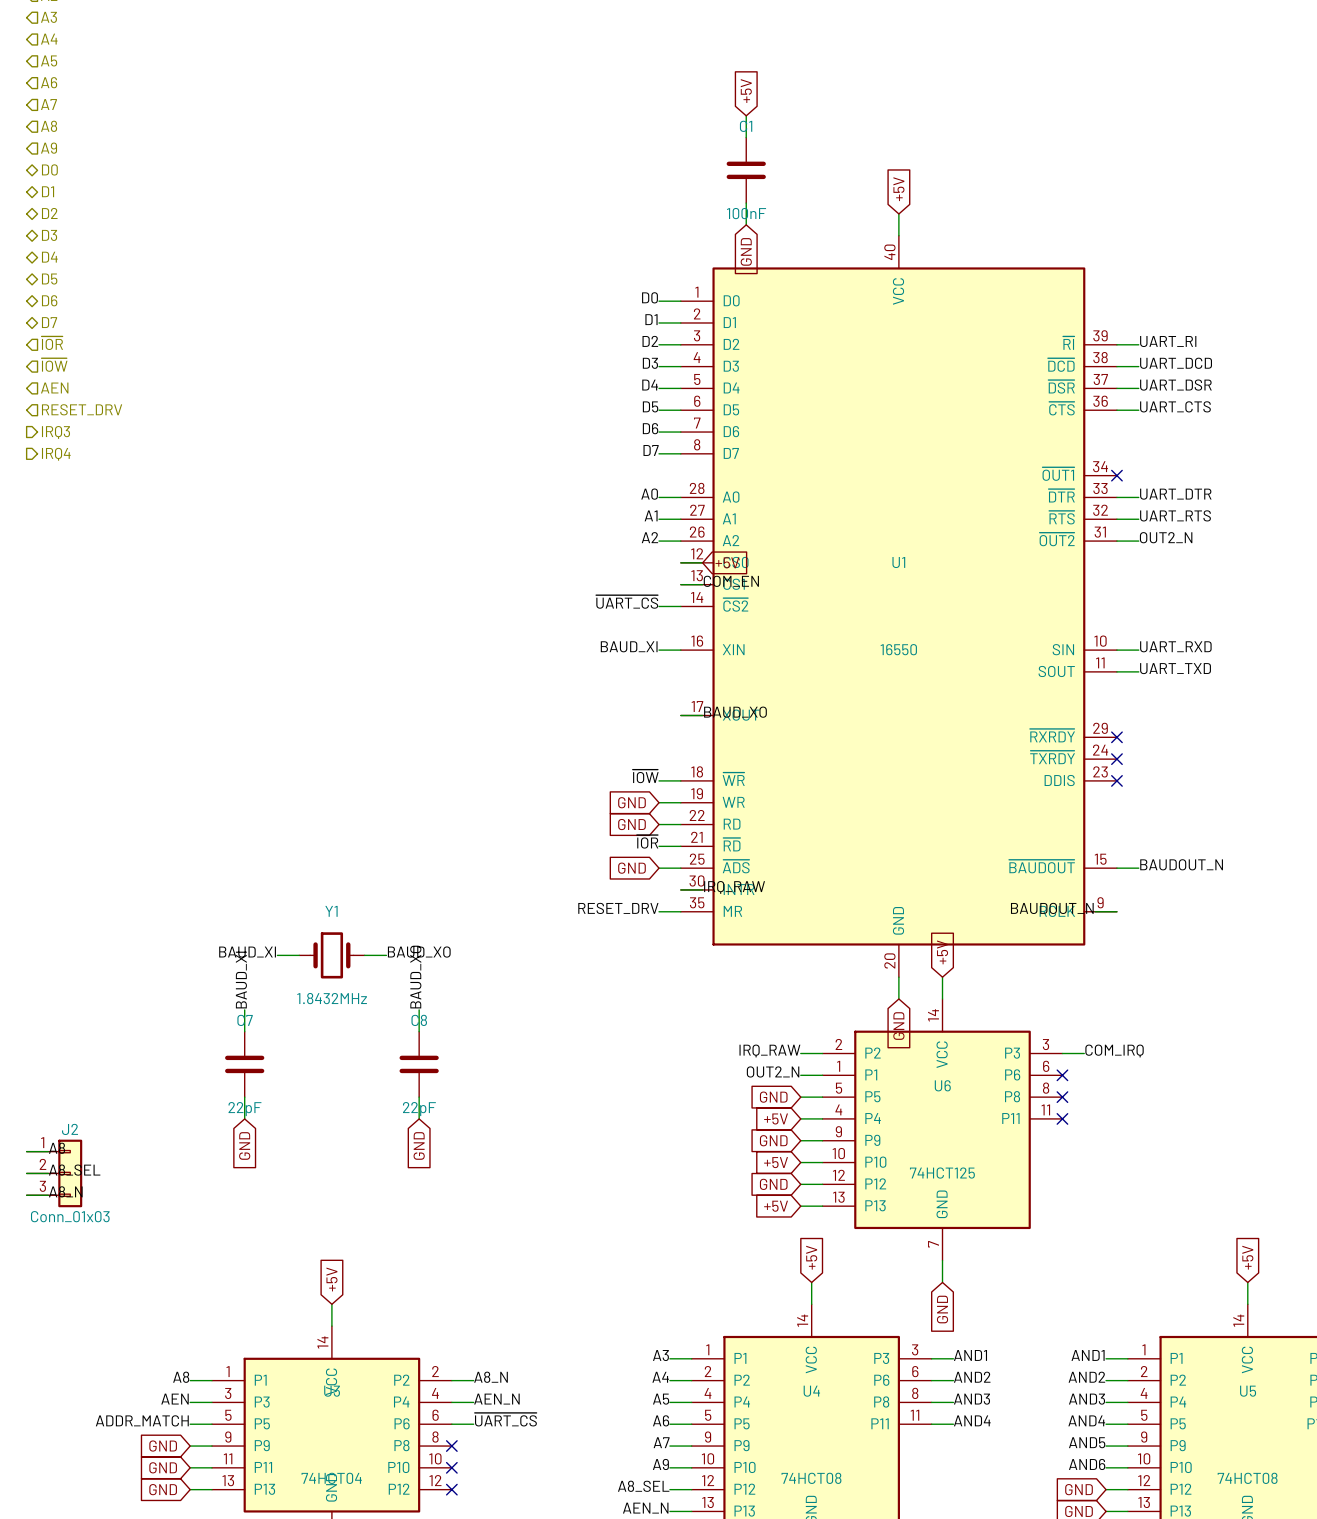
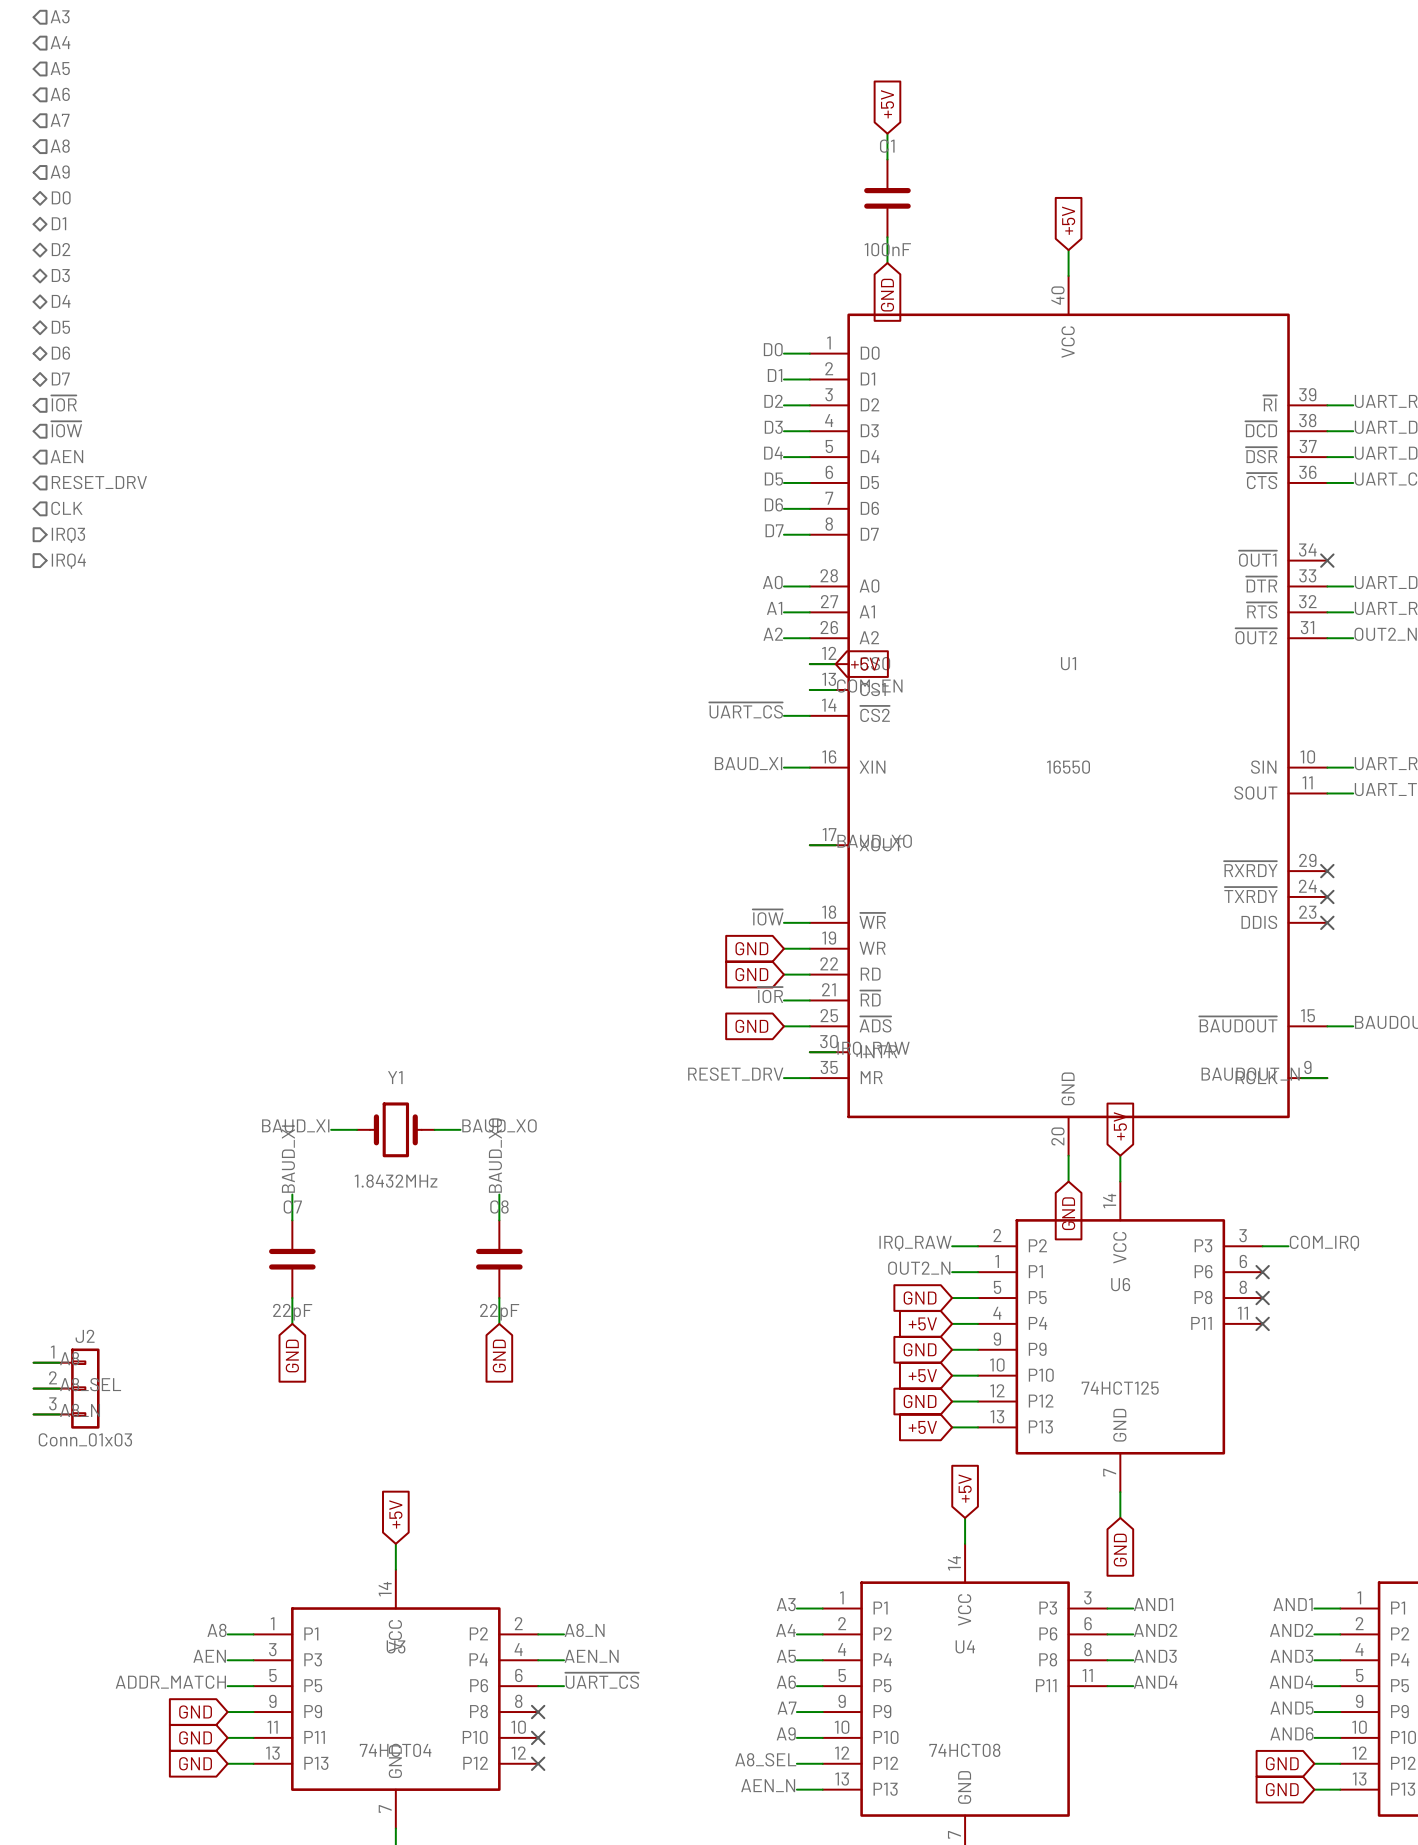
hierarchical label shape: output (55, 432) -> input (66, 508)
hierarchical label: IRQ3 (55, 432) -> CLK (66, 508)
hierarchical label: IRQ4 (56, 454) -> IRQ3 (68, 535)
hierarchical label: none -> IRQ4 (68, 561)

